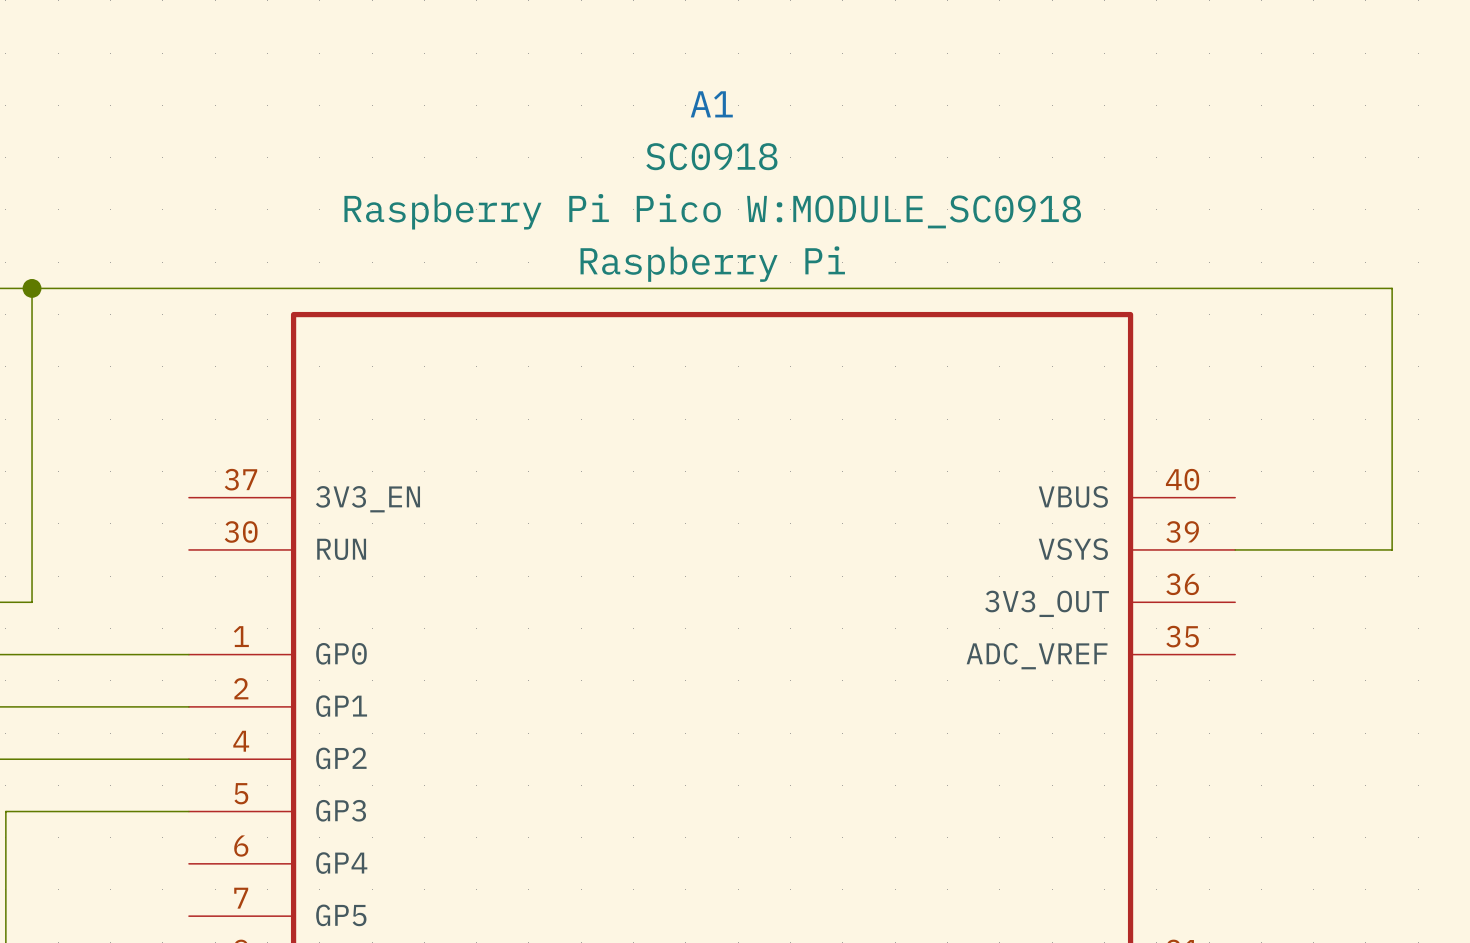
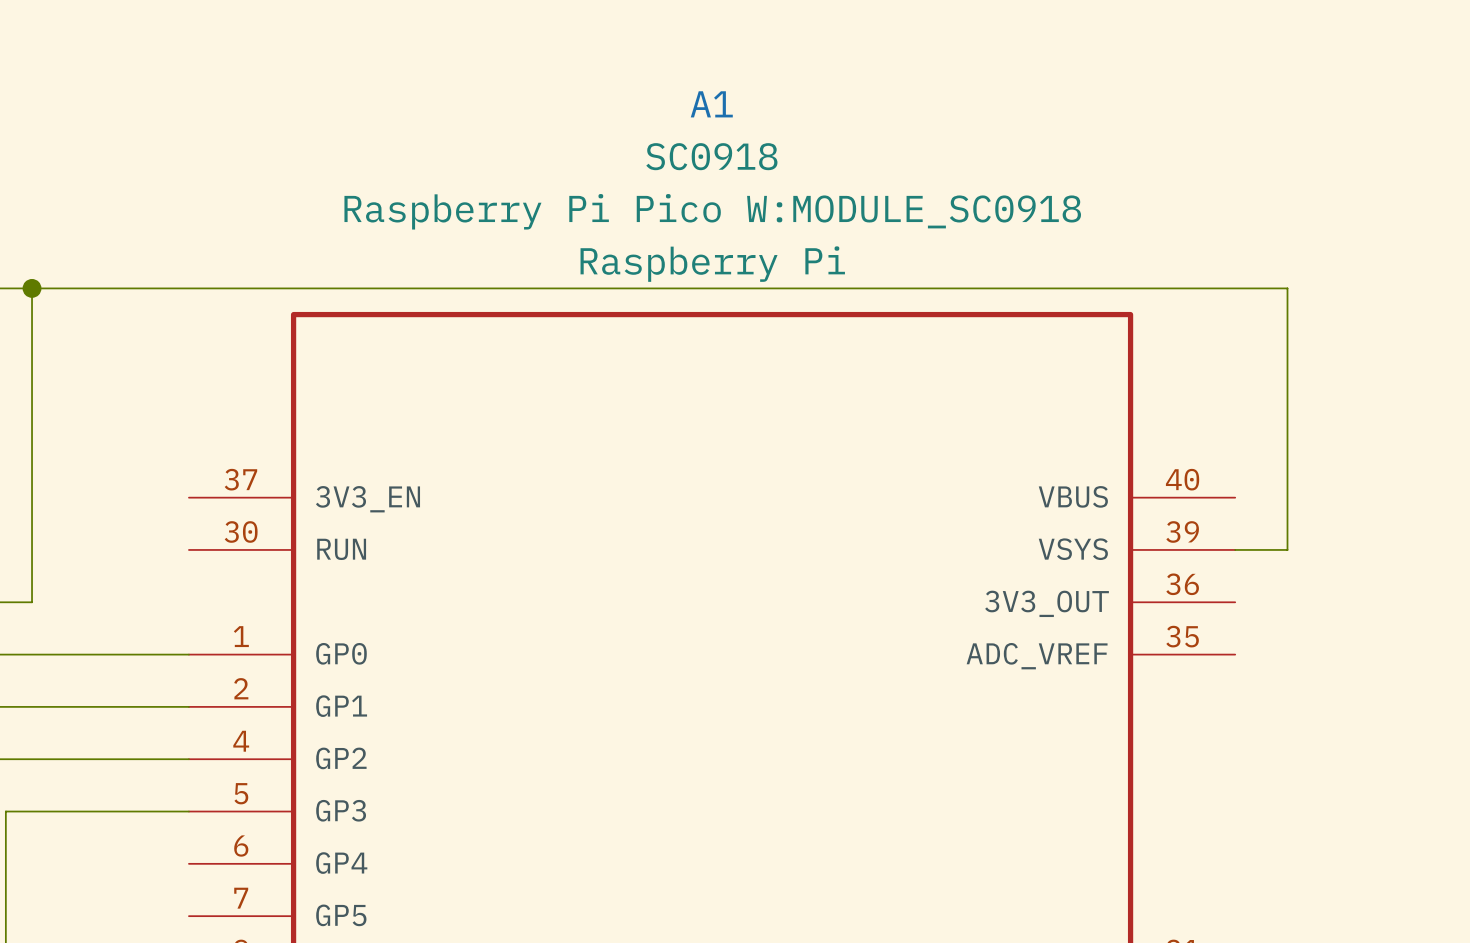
wire: (1287, 288) (1392, 288) (1392, 549) (1287, 549) -> (1287, 288) (1287, 549)

